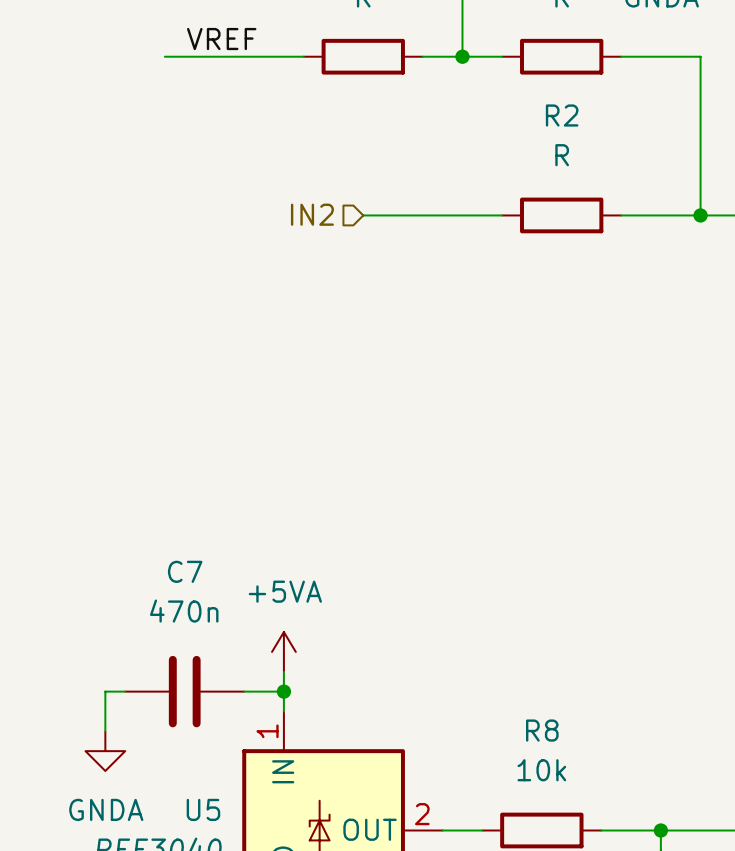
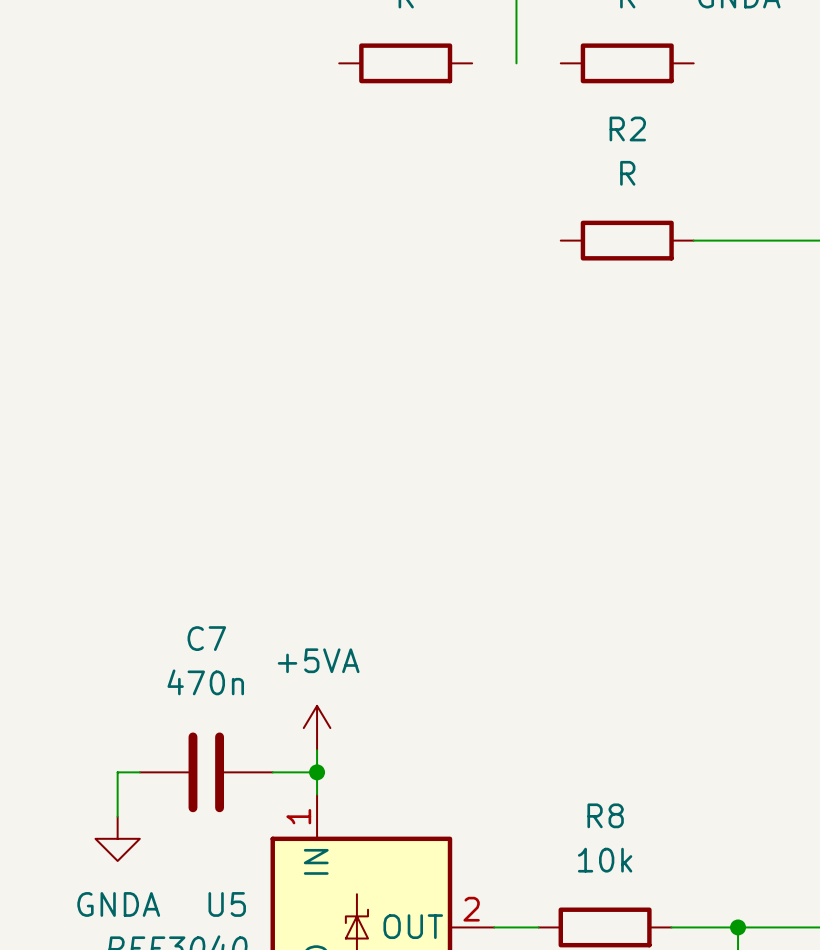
label: VREF (221, 39) -> none
wire: (164, 56) (303, 56) -> none
wire: (422, 56) (502, 56) -> none
junction: (462, 56) -> none
wire: (621, 56) (700, 56) (700, 215) -> none
hierarchical label: IN2 (312, 214) -> none
wire: (363, 215) (502, 215) -> none
junction: (700, 215) -> none

